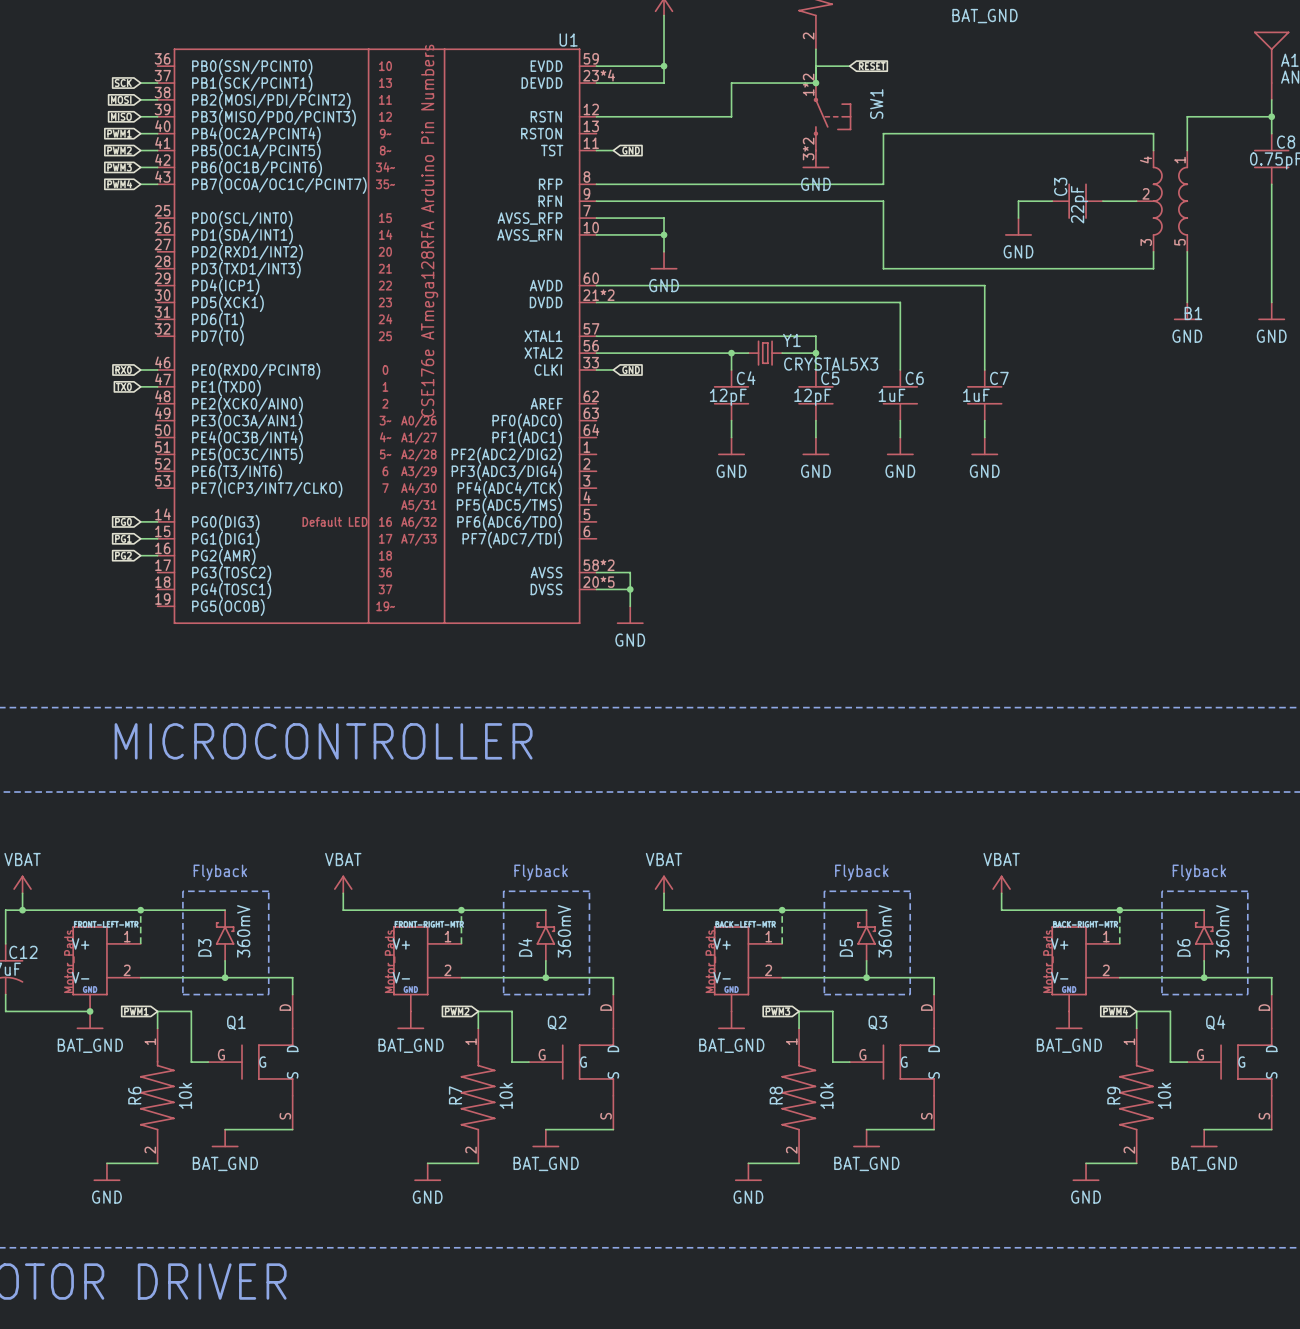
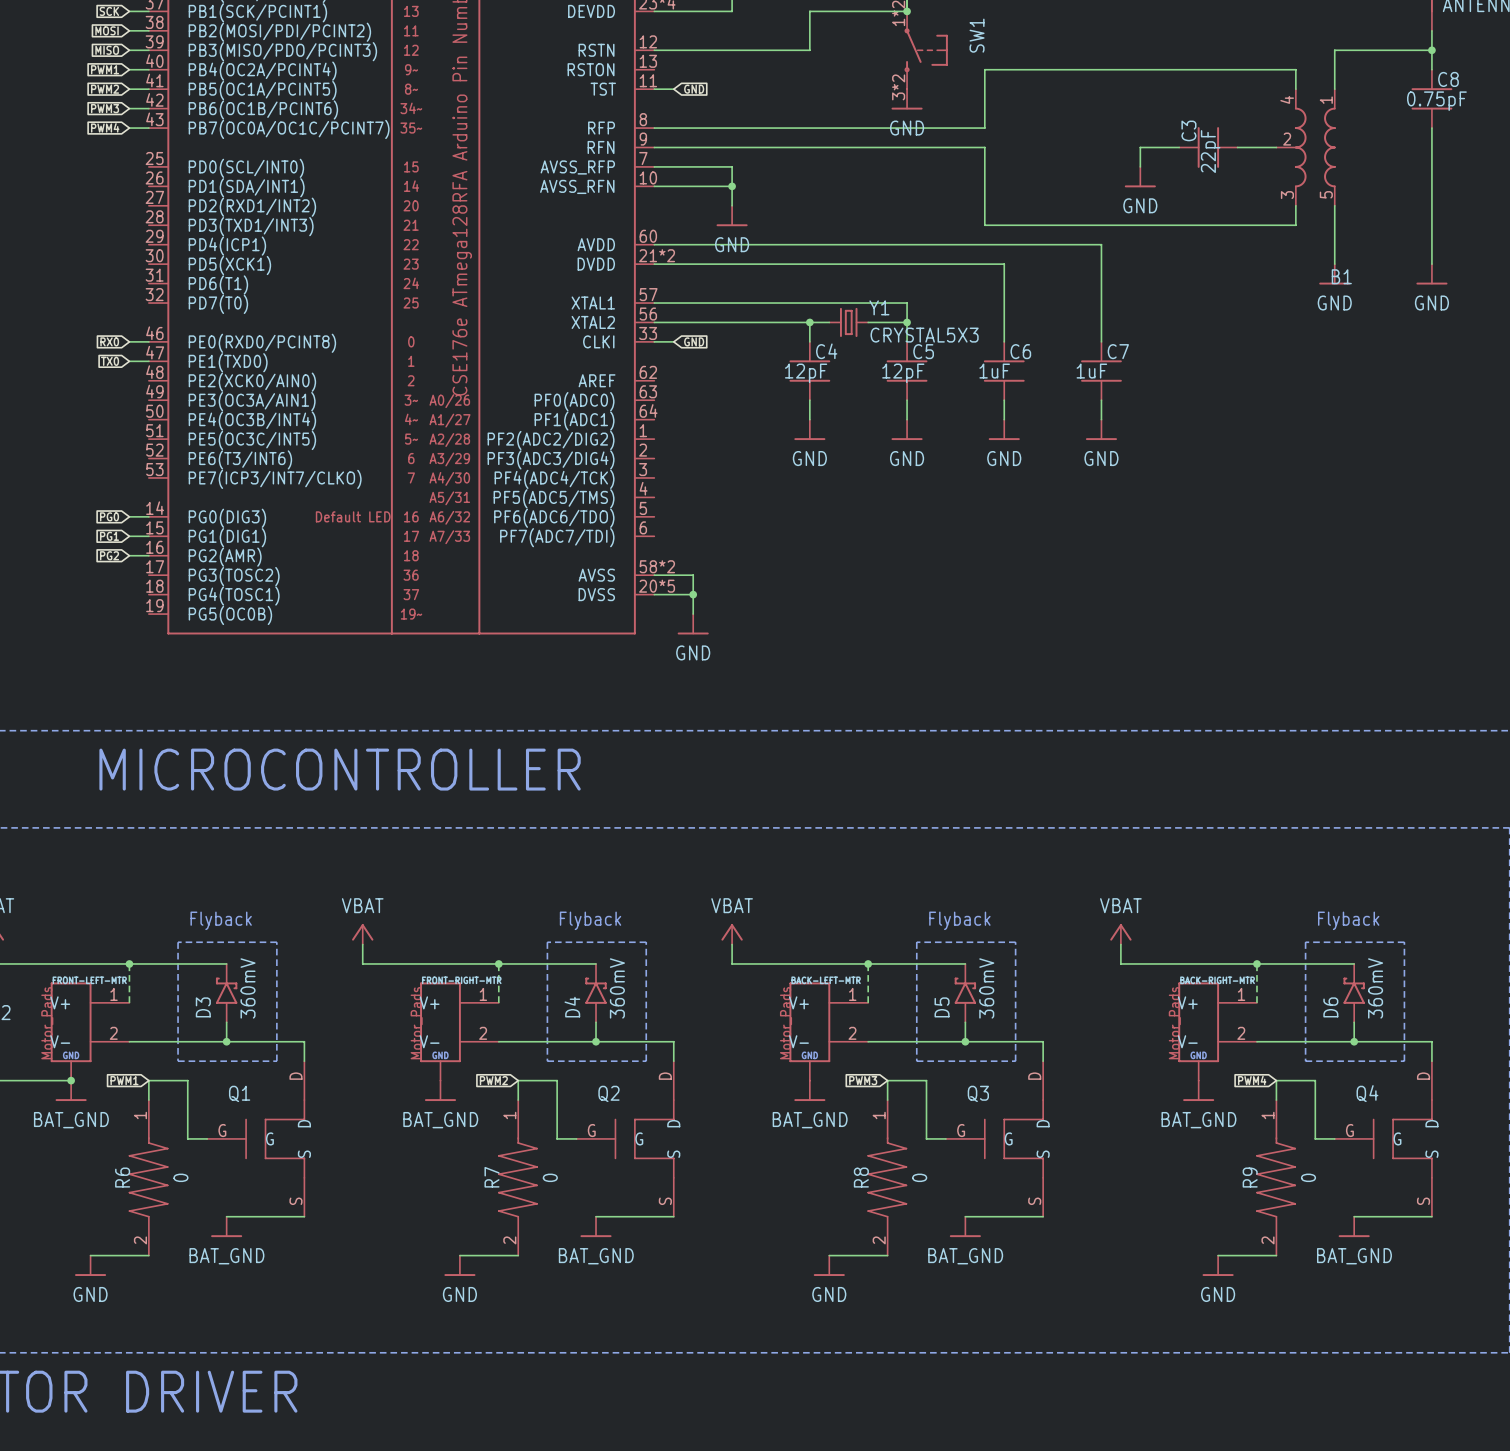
R6 value: 10k (185, 1095) -> 0 (180, 1177)
R7 value: 10k (506, 1095) -> 0 (550, 1177)
R8 value: 10k (826, 1095) -> 0 (919, 1177)
R9 value: 10k (1164, 1095) -> 0 (1308, 1177)

